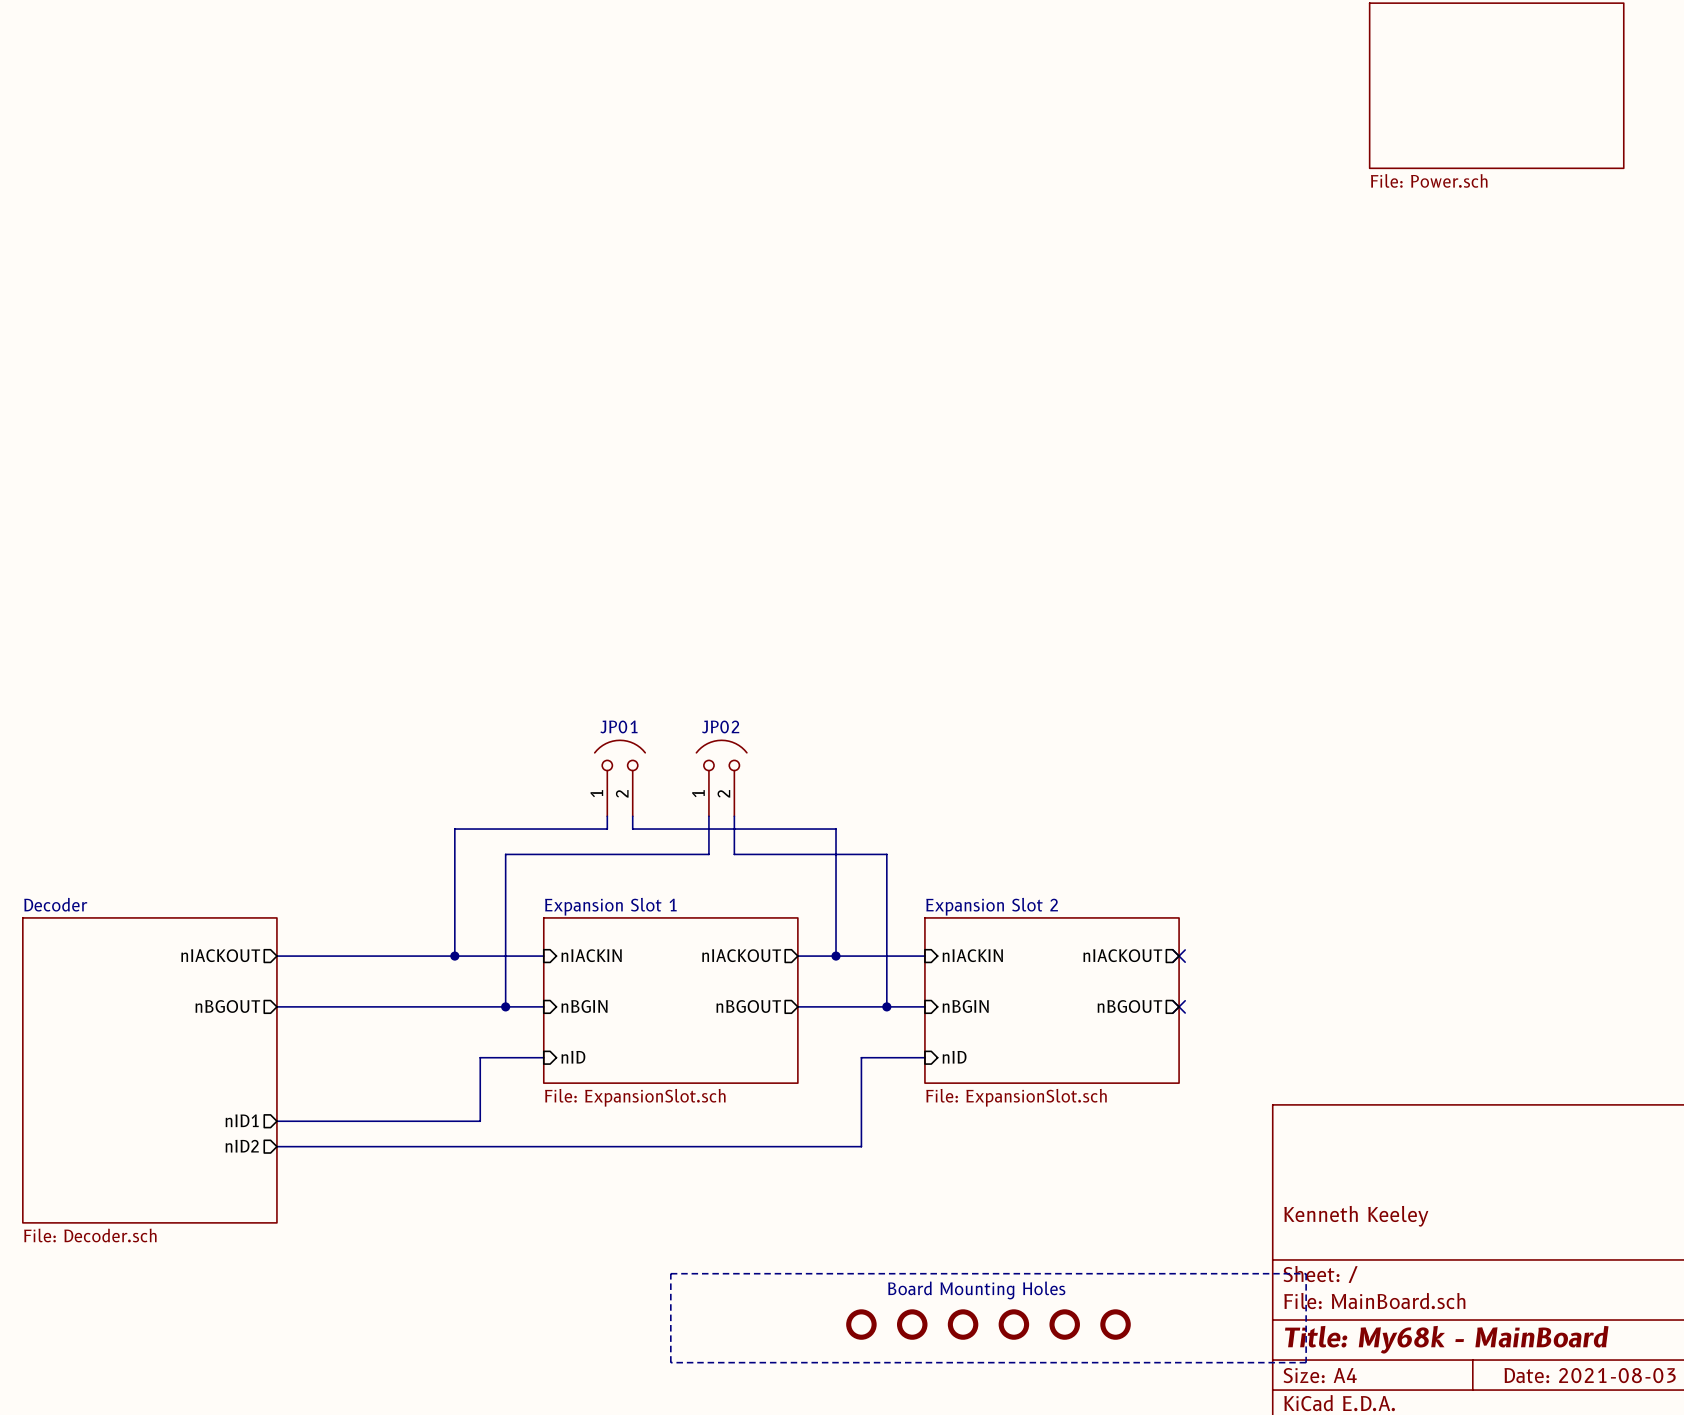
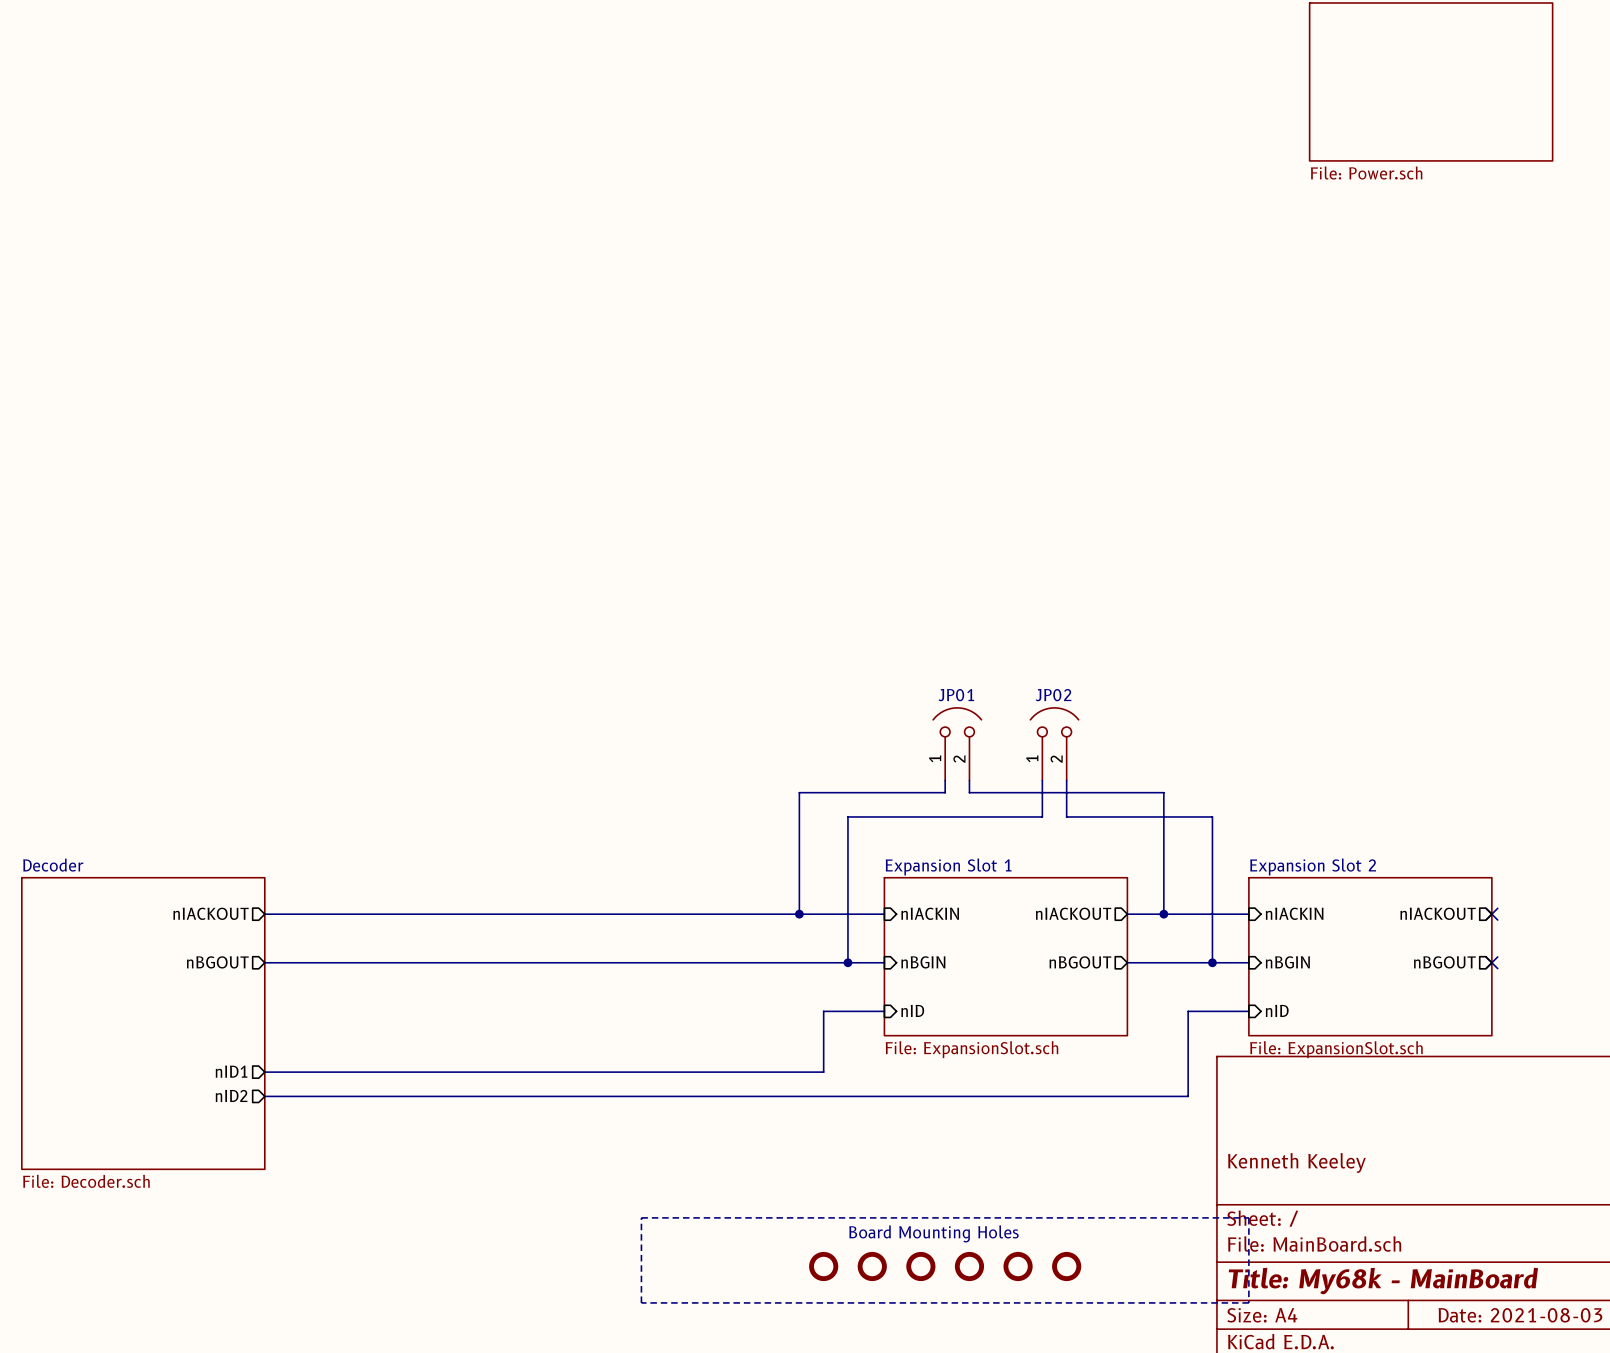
JP01 position: (619, 778) -> (957, 744)
JP02 position: (721, 778) -> (1054, 744)
wire: (607, 816) (607, 829) (454, 829) (454, 956) -> none
wire: (632, 816) (632, 829) (836, 829) -> (945, 780) (945, 792) (799, 792)
wire: (708, 816) (708, 854) (505, 854) (505, 1006) -> none
wire: (734, 816) (734, 854) (886, 854) -> (1042, 780) (1042, 816) (847, 816)
wire: none -> (969, 780) (969, 792) (1163, 792) (1163, 914)
wire: none -> (1066, 780) (1066, 816) (1212, 816) (1212, 962)
sheet Expansion Slot 2 name: Expansion Slot 2 (992, 906) -> Expansion Slot 1 (948, 866)
sheet pin: nIACKIN (591, 955) -> none
sheet pin: nIACKOUT (741, 955) -> none
sheet pin: none -> nIACKIN (1294, 913)
sheet pin: none -> nIACKOUT (1438, 913)
junction: (454, 956) -> none
wire: none -> (519, 914) (762, 914)
wire: none -> (1127, 914) (1248, 914)
no-connect mark: (1179, 956) -> none
junction: none -> (1163, 914)
no-connect mark: none -> (1491, 914)
sheet Expansion Slot 1: File: ExpansionSlot.sch (670, 1000) -> none
sheet Expansion Slot 2: none -> File: ExpansionSlot.sch (1370, 956)
junction: (505, 1006) -> none
wire: none -> (519, 962) (762, 962)
sheet pin: nBGIN (584, 1006) -> none
sheet pin: nBGOUT (748, 1006) -> none
wire: none -> (1127, 962) (1248, 962)
no-connect mark: (1179, 1006) -> none
junction: none -> (1212, 962)
sheet pin: none -> nBGIN (1287, 962)
sheet pin: none -> nBGOUT (1444, 962)
no-connect mark: none -> (1491, 962)
wire: (543, 1057) (480, 1057) (480, 1121) -> (823, 1072) (459, 1072)
sheet pin: nID (573, 1057) -> none
sheet pin: none -> nID (1277, 1010)
wire: (861, 1121) (861, 1146) -> (1248, 1011) (1188, 1011) (1188, 1096) (823, 1096)

